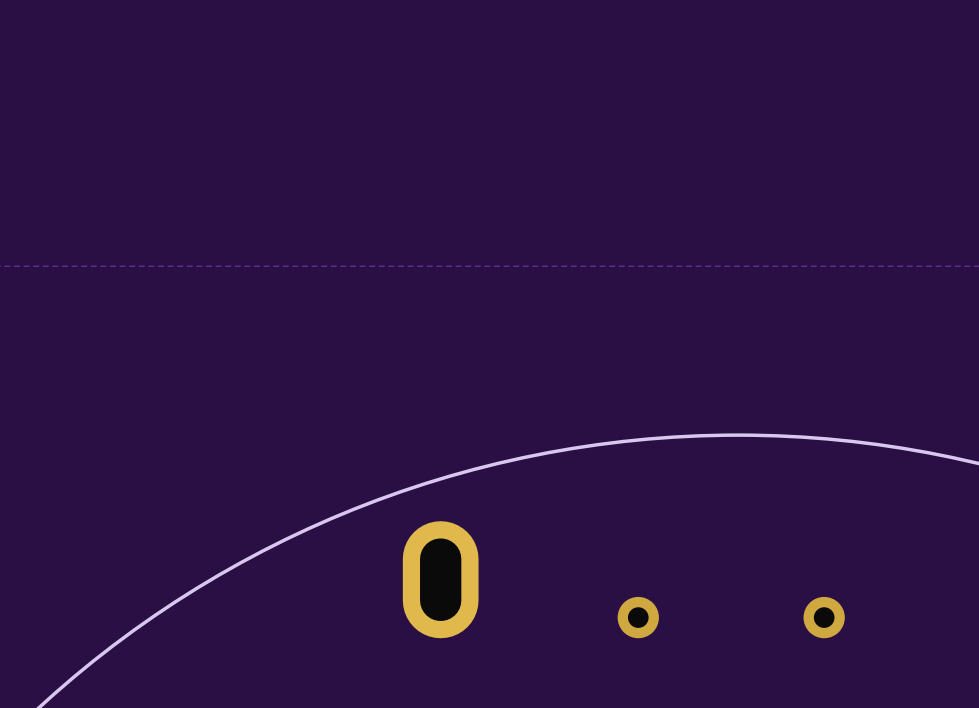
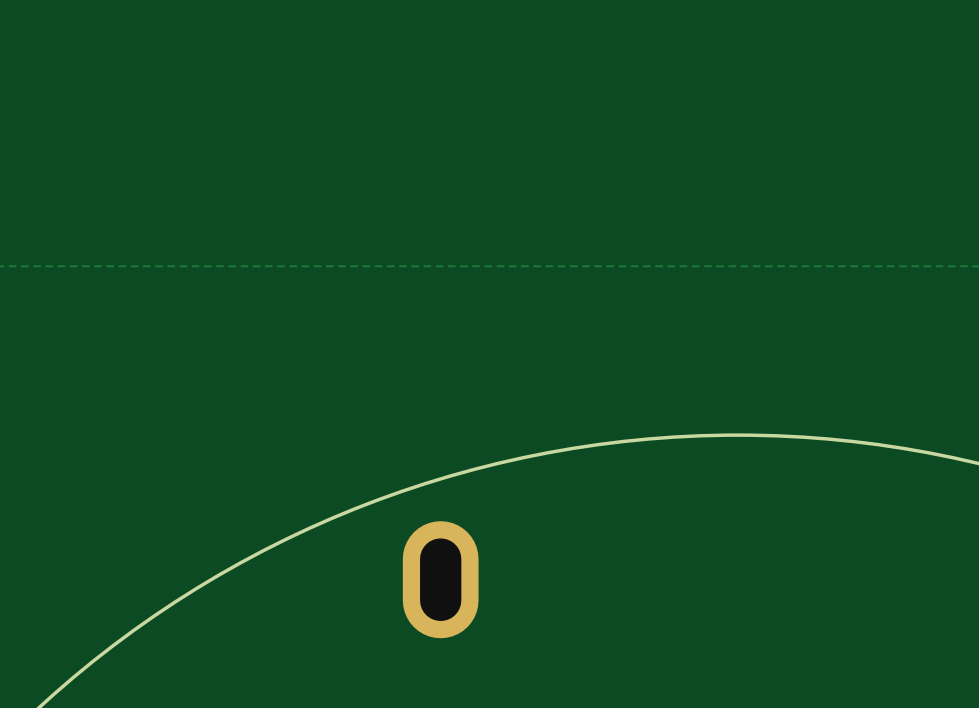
via: (638, 617) -> none
via: (824, 617) -> none

